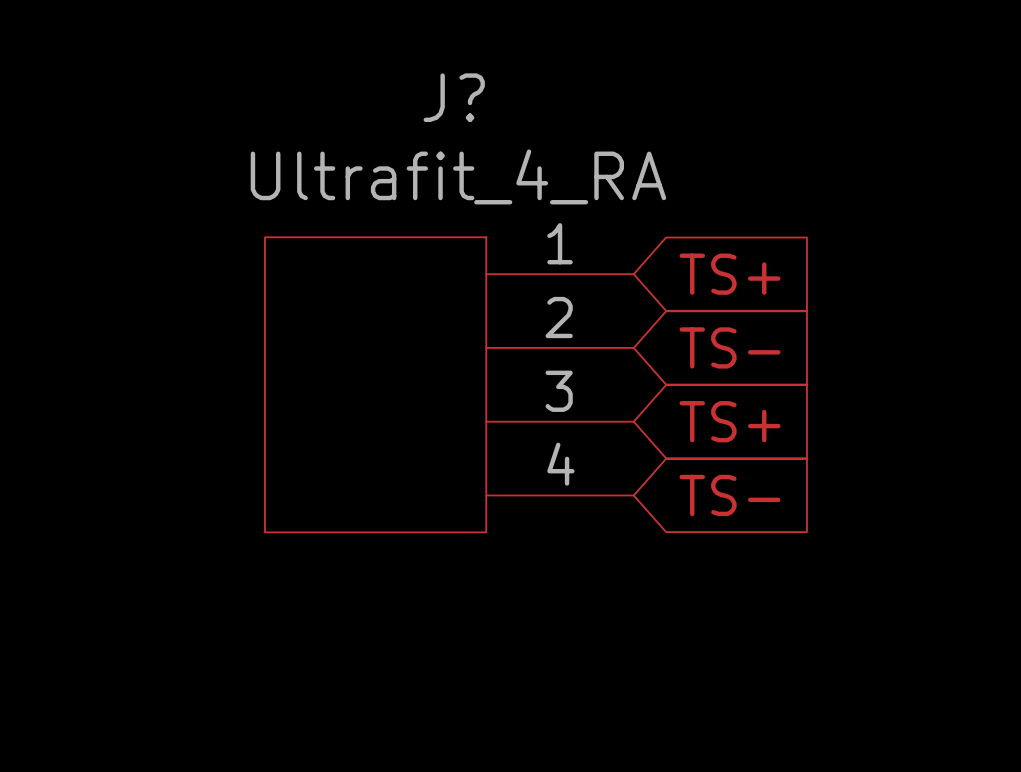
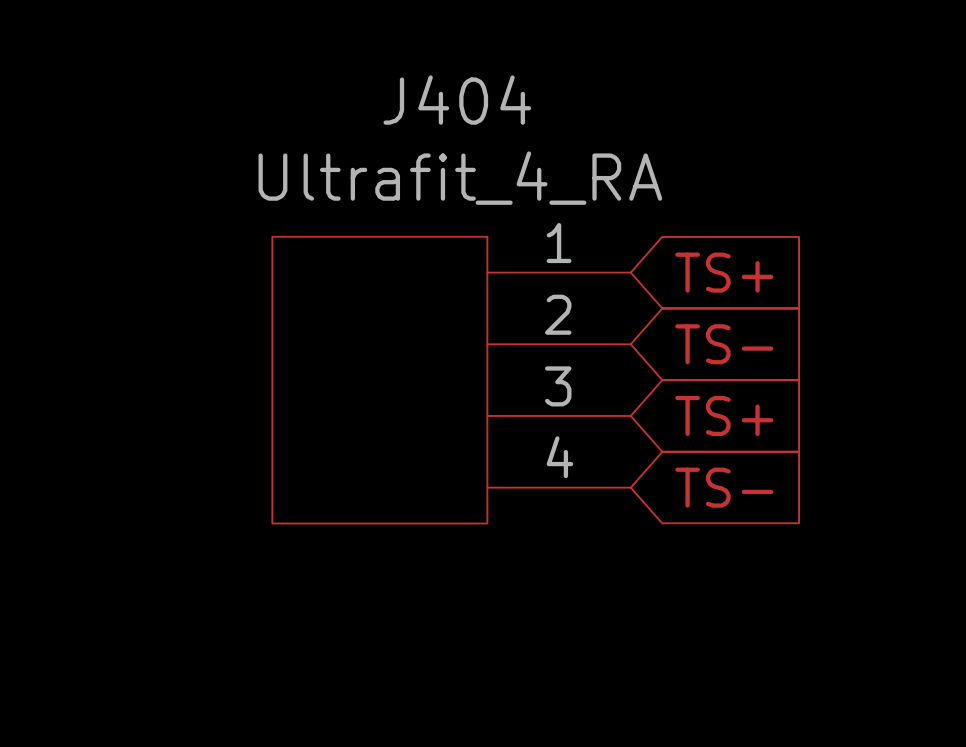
J? name: J? (454, 97) -> J404 (457, 100)

